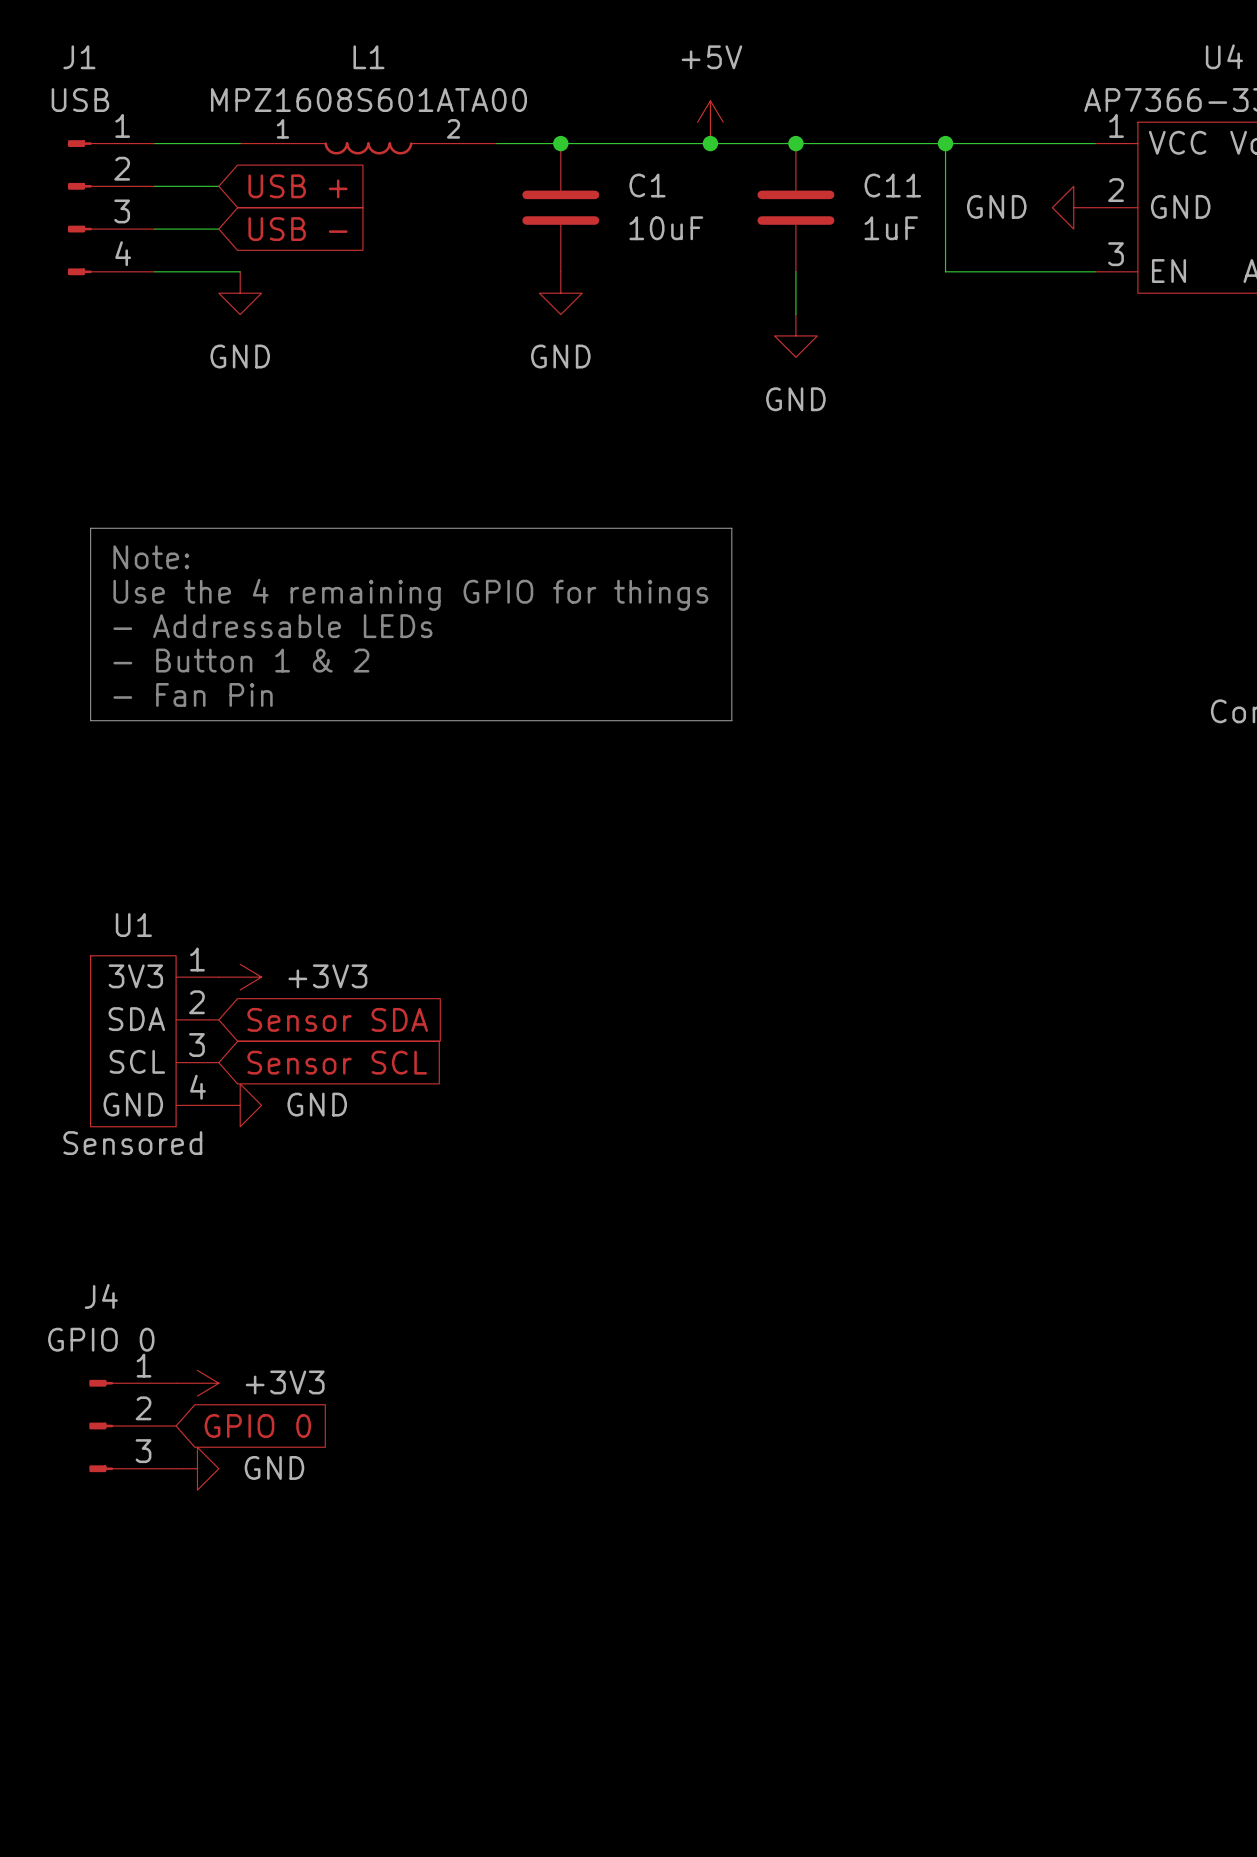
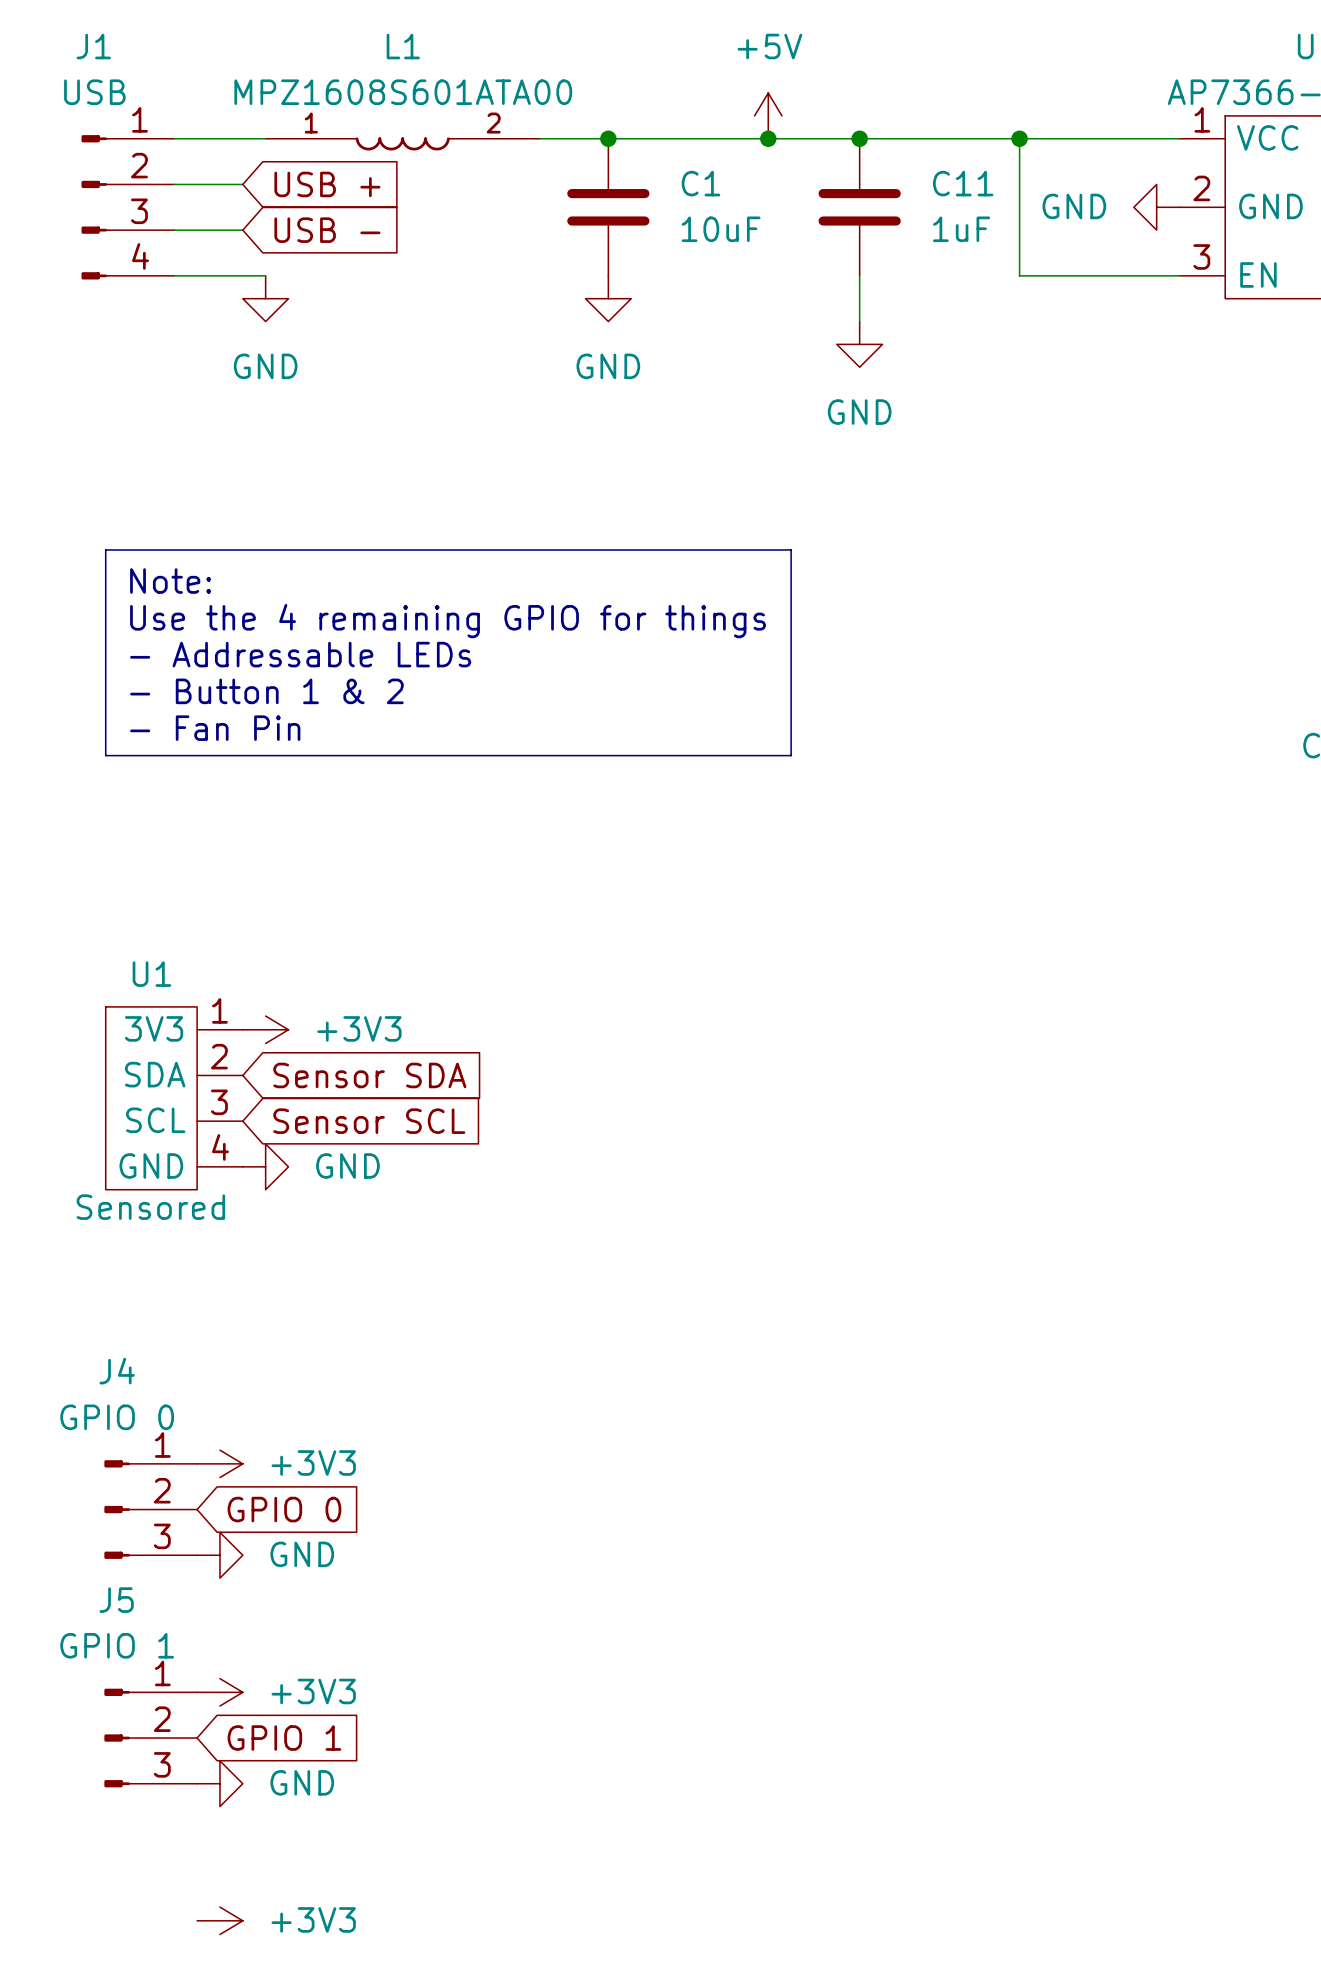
power symbol: none -> +3V3 (219, 1692)
J5: none -> GPIO 1 (150, 1738)
global label: none -> GPIO 1 (284, 1738)
power symbol: none -> GND (219, 1783)
power symbol: none -> +3V3 (219, 1920)

